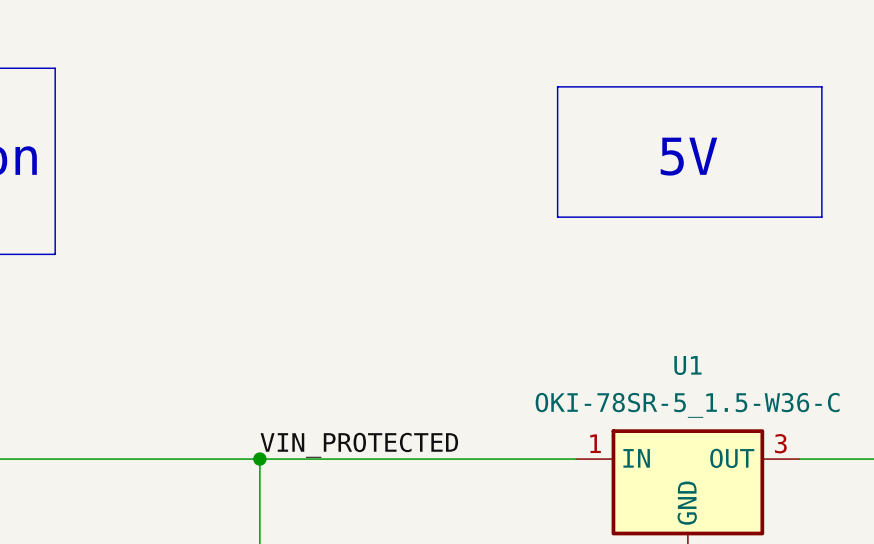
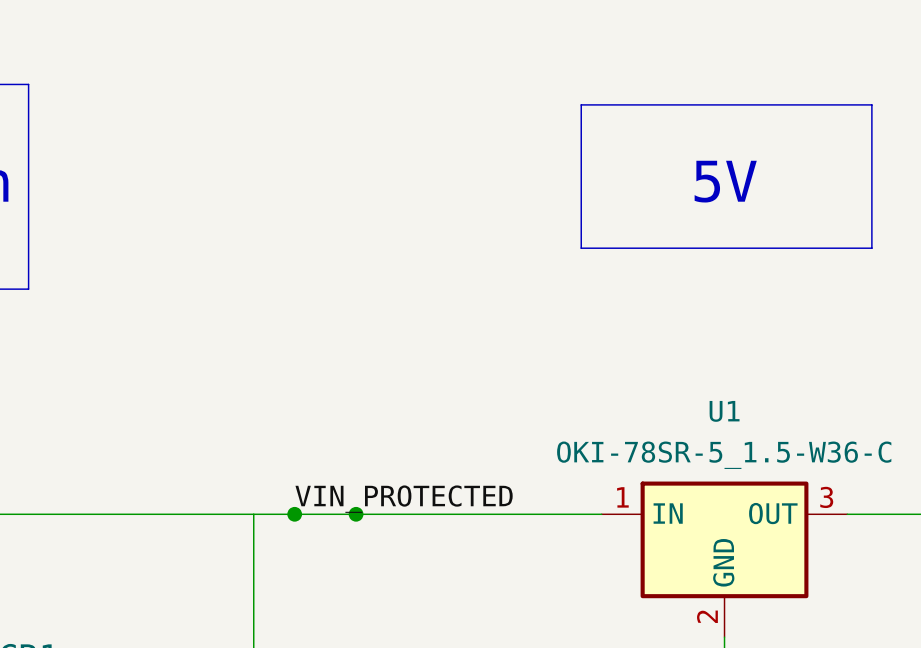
label position: VIN_PROTECTED (359, 445) -> VIN_PROTECTED (404, 499)
junction position: (259, 459) -> (294, 514)
junction: none -> (356, 514)

